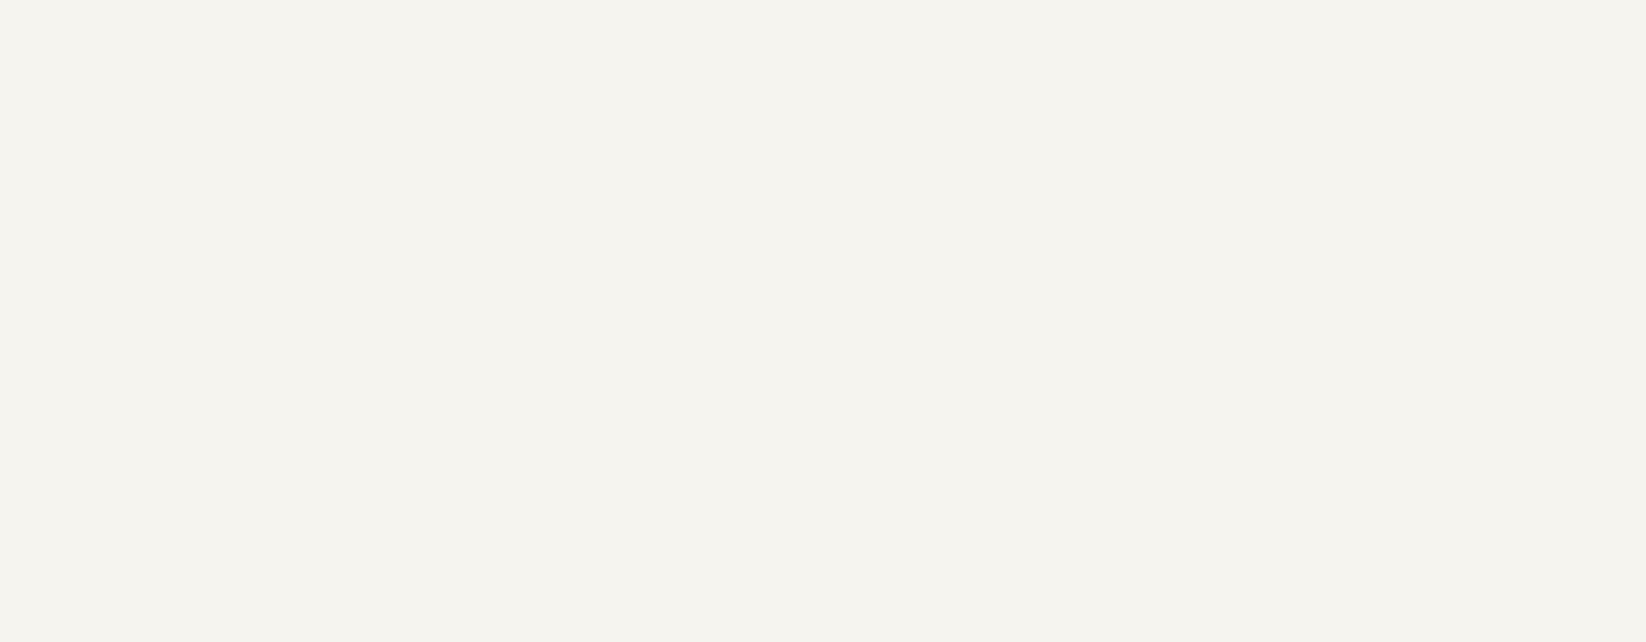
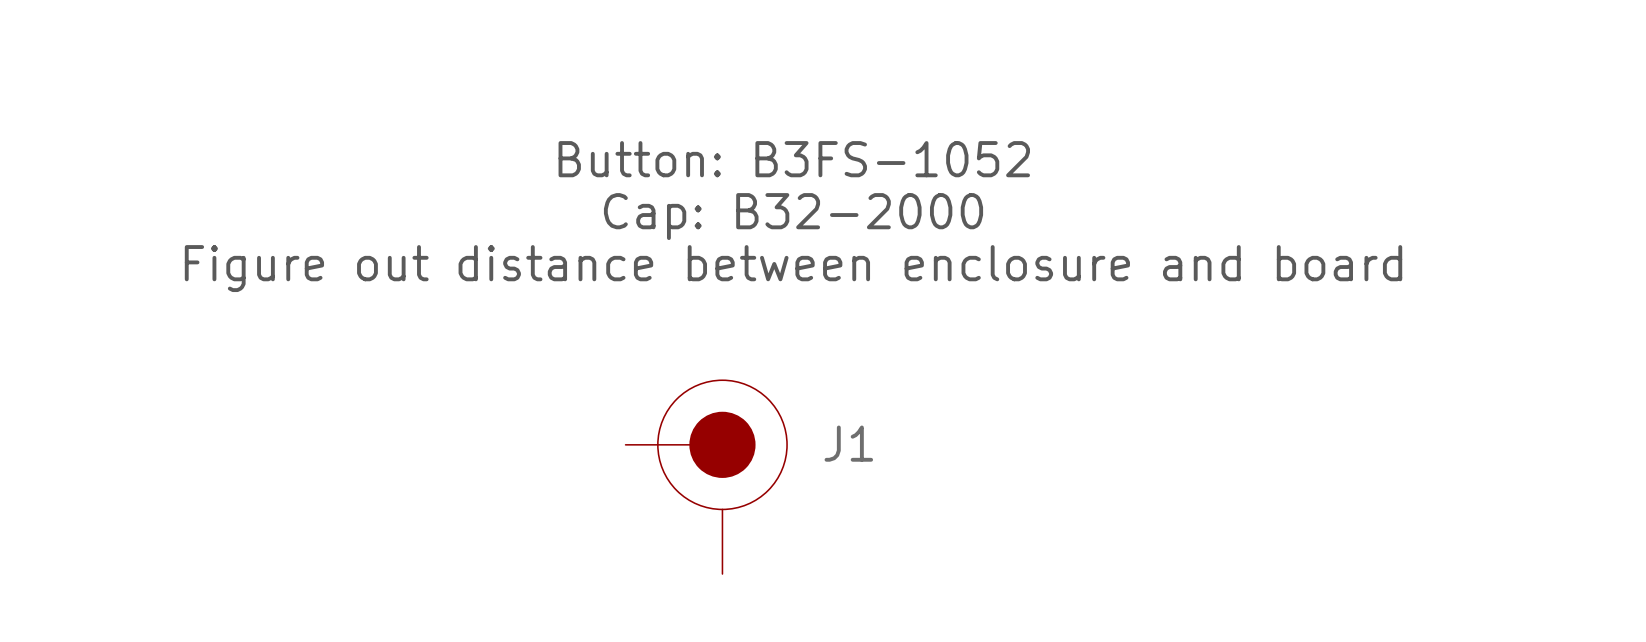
text: none -> Button: B3FS-1052 (794, 159)
text: none -> Cap: B32-2000 (793, 216)
text: none -> Figure out distance between enclosure and board (793, 268)
J1: none -> (706, 477)

